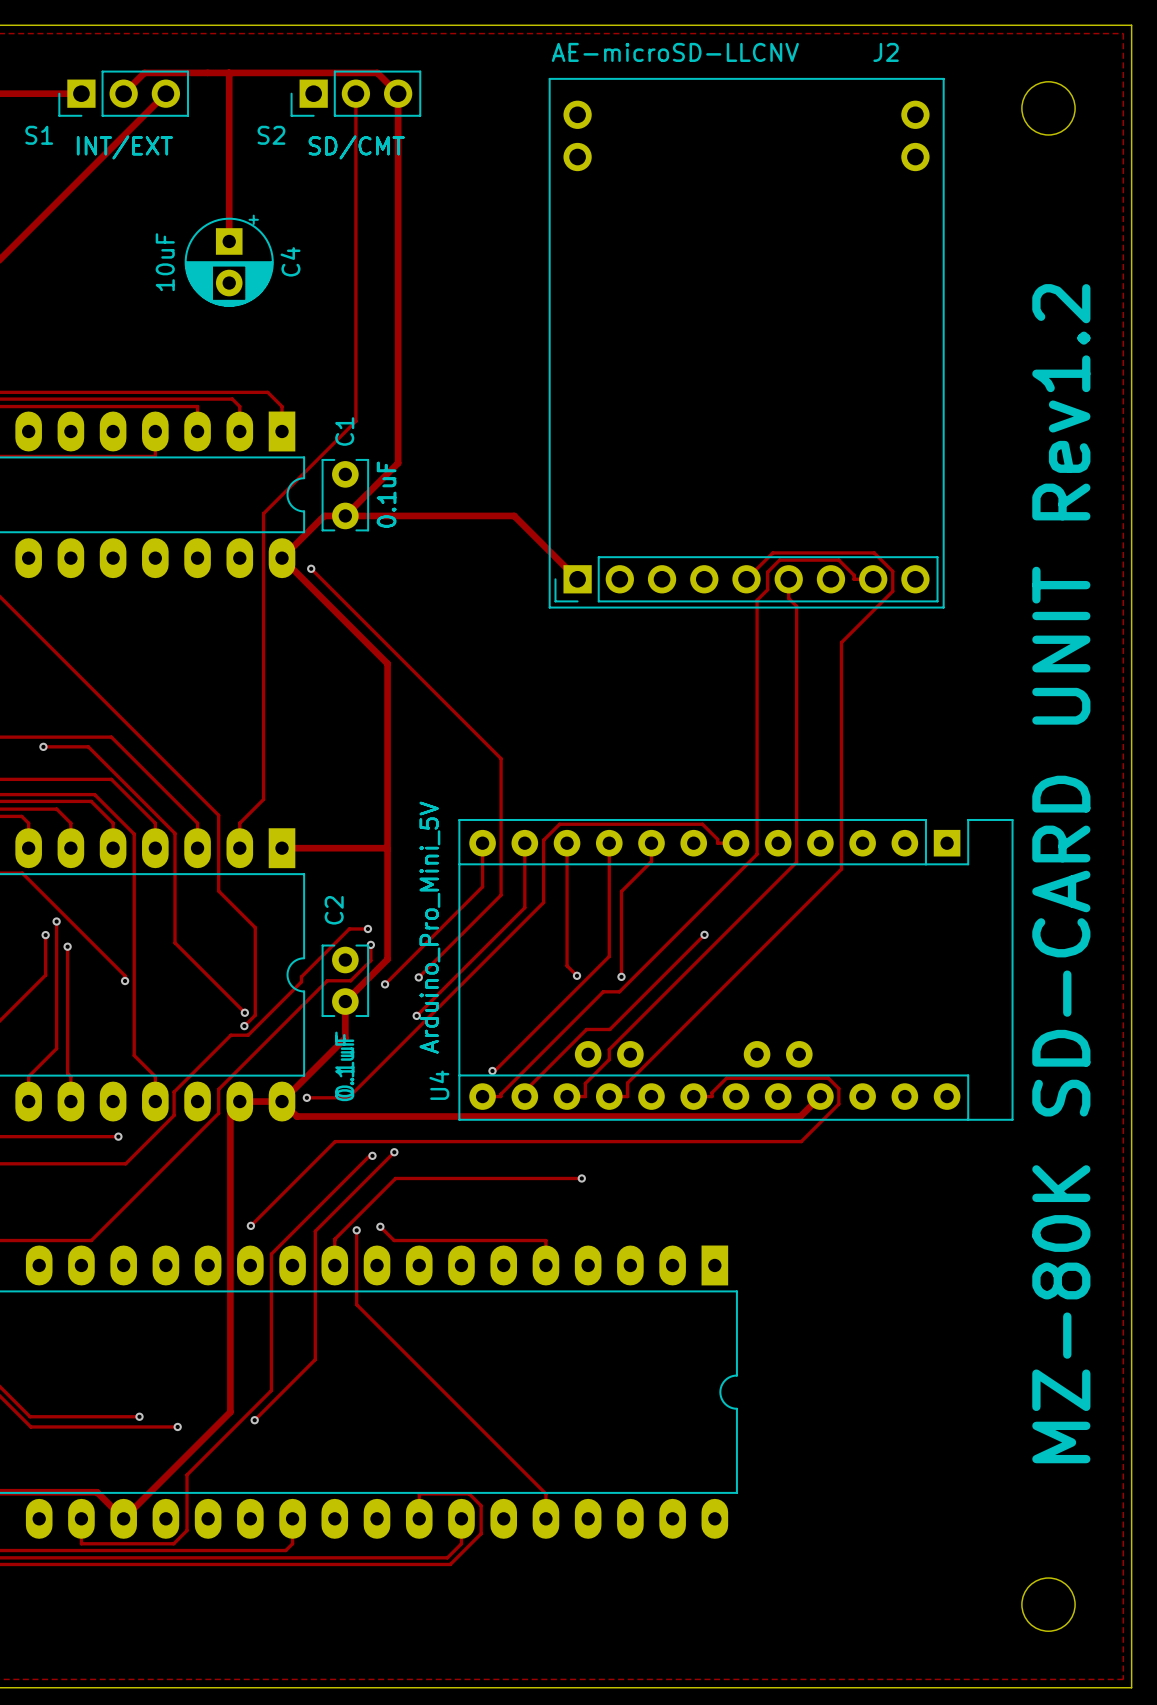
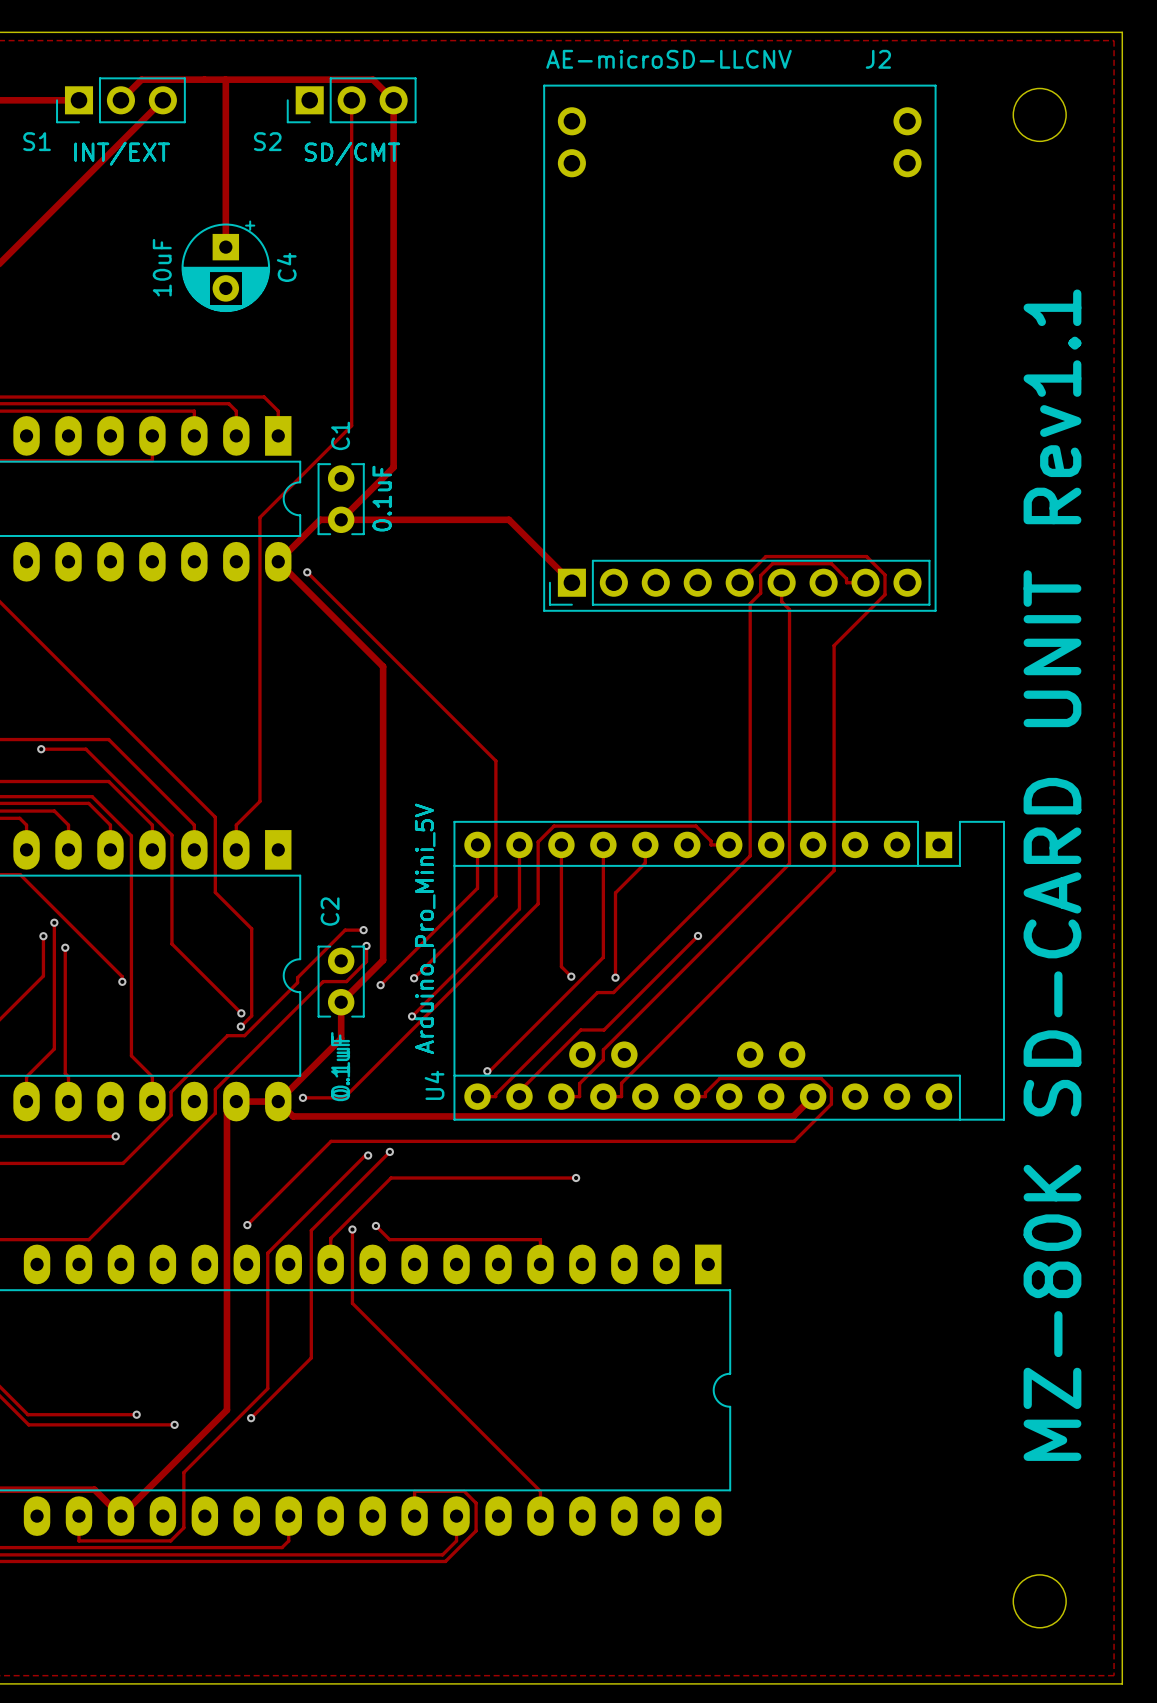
track: (282, 848) (387, 849) -> none
text: MZ-80K SD-CARD UNIT Rev1.2 (1061, 873) -> MZ-80K SD-CARD UNIT Rev1.1 (1052, 875)

